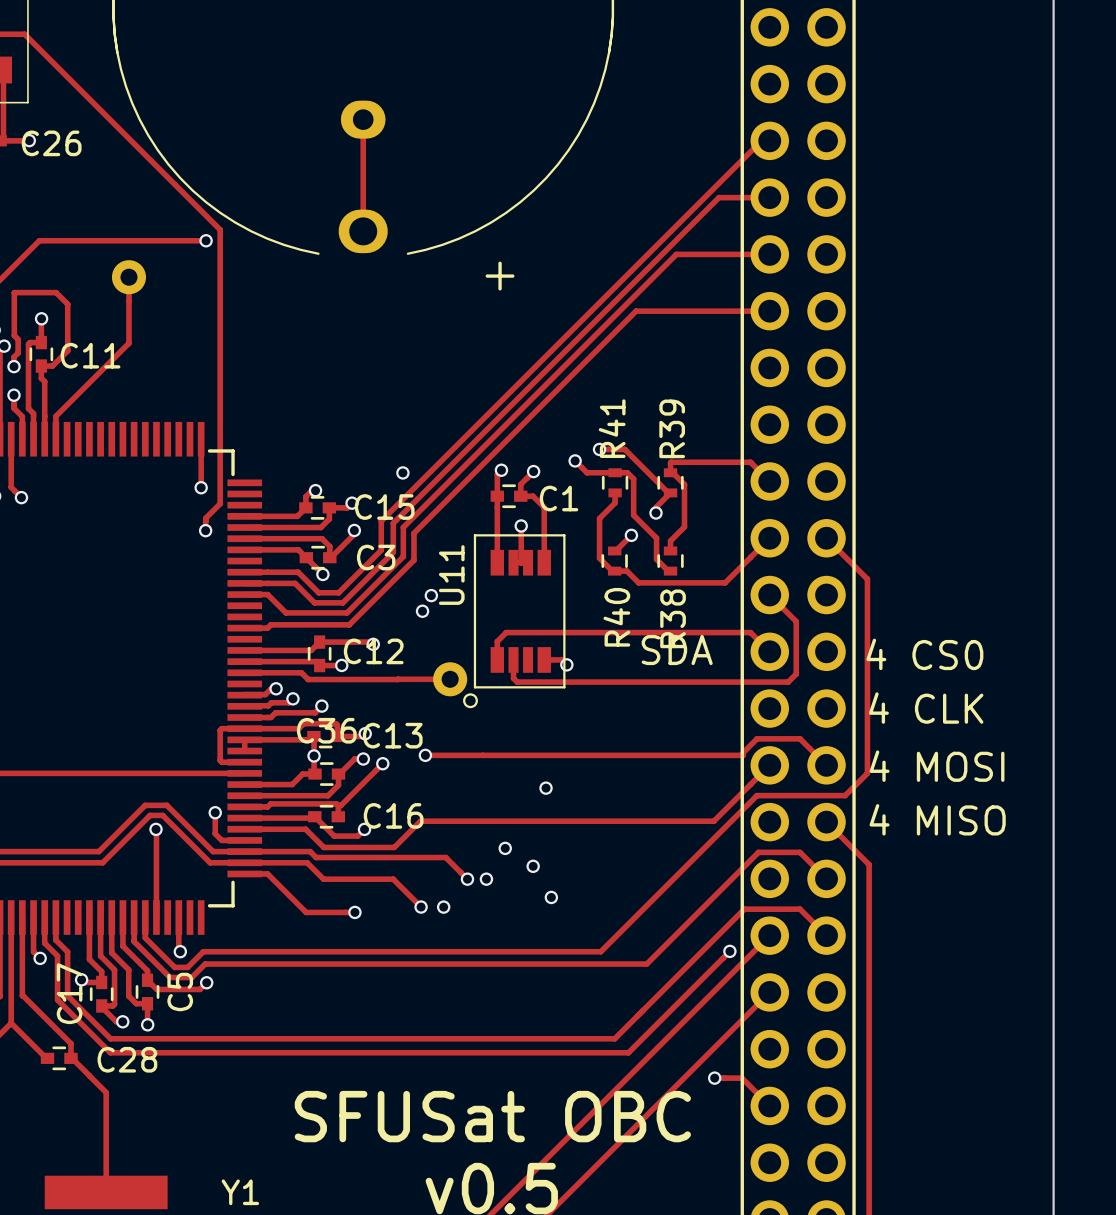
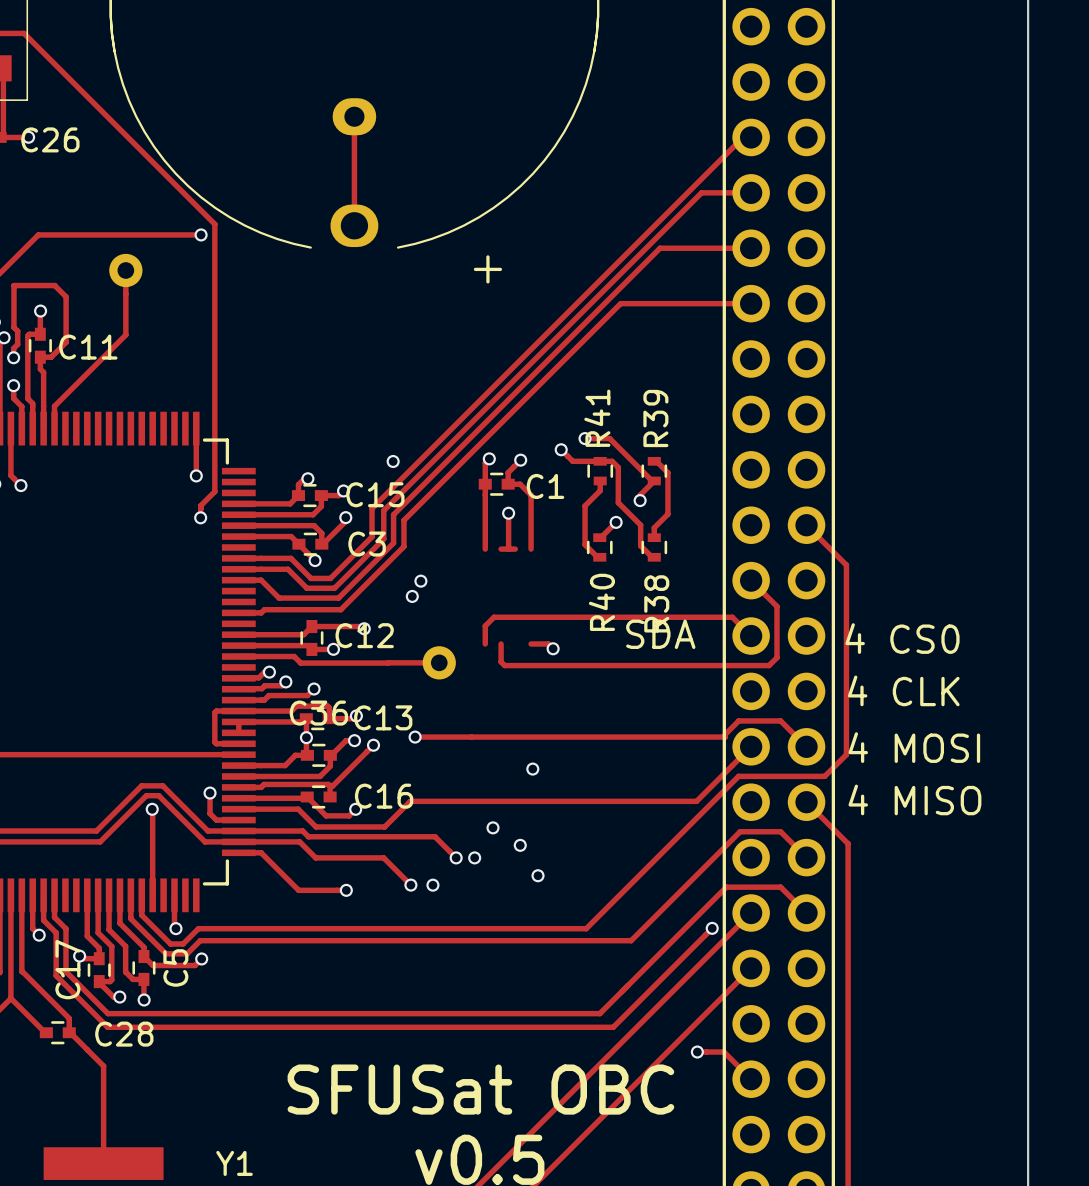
track: (670, 472) (670, 462) (750, 462) (769, 481) -> none
track: (769, 538) (725, 582) (638, 582) (626, 571) (614, 571) -> none
U11: (514, 621) -> none

